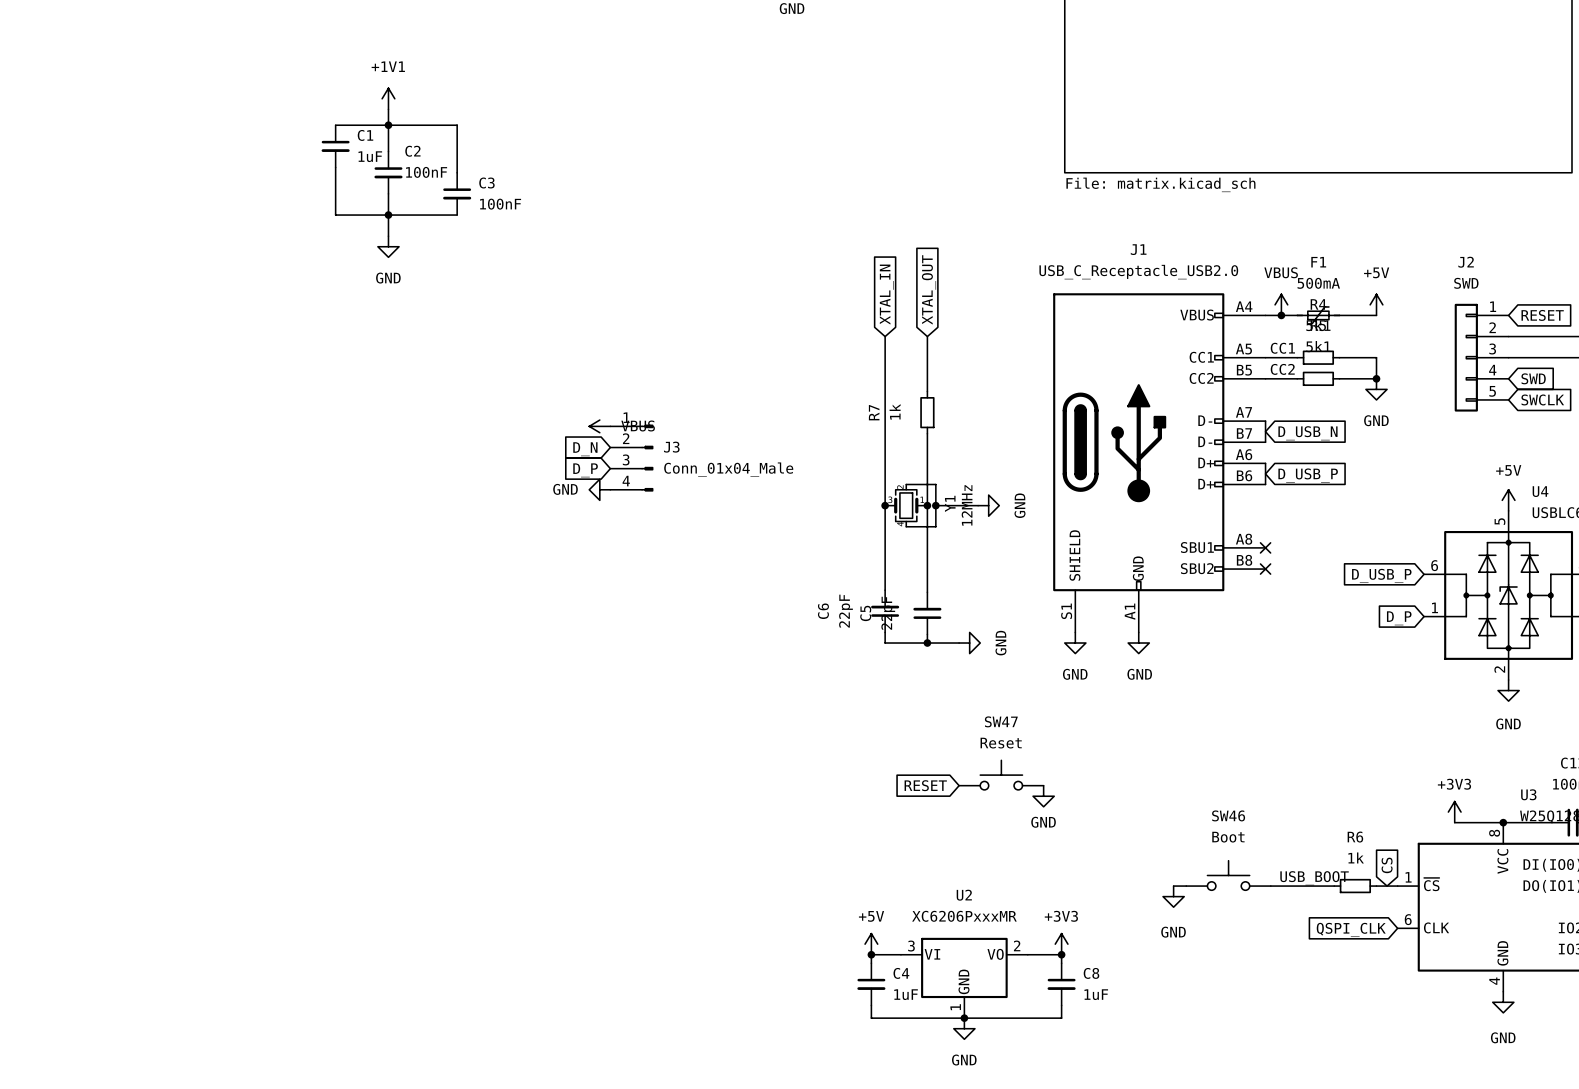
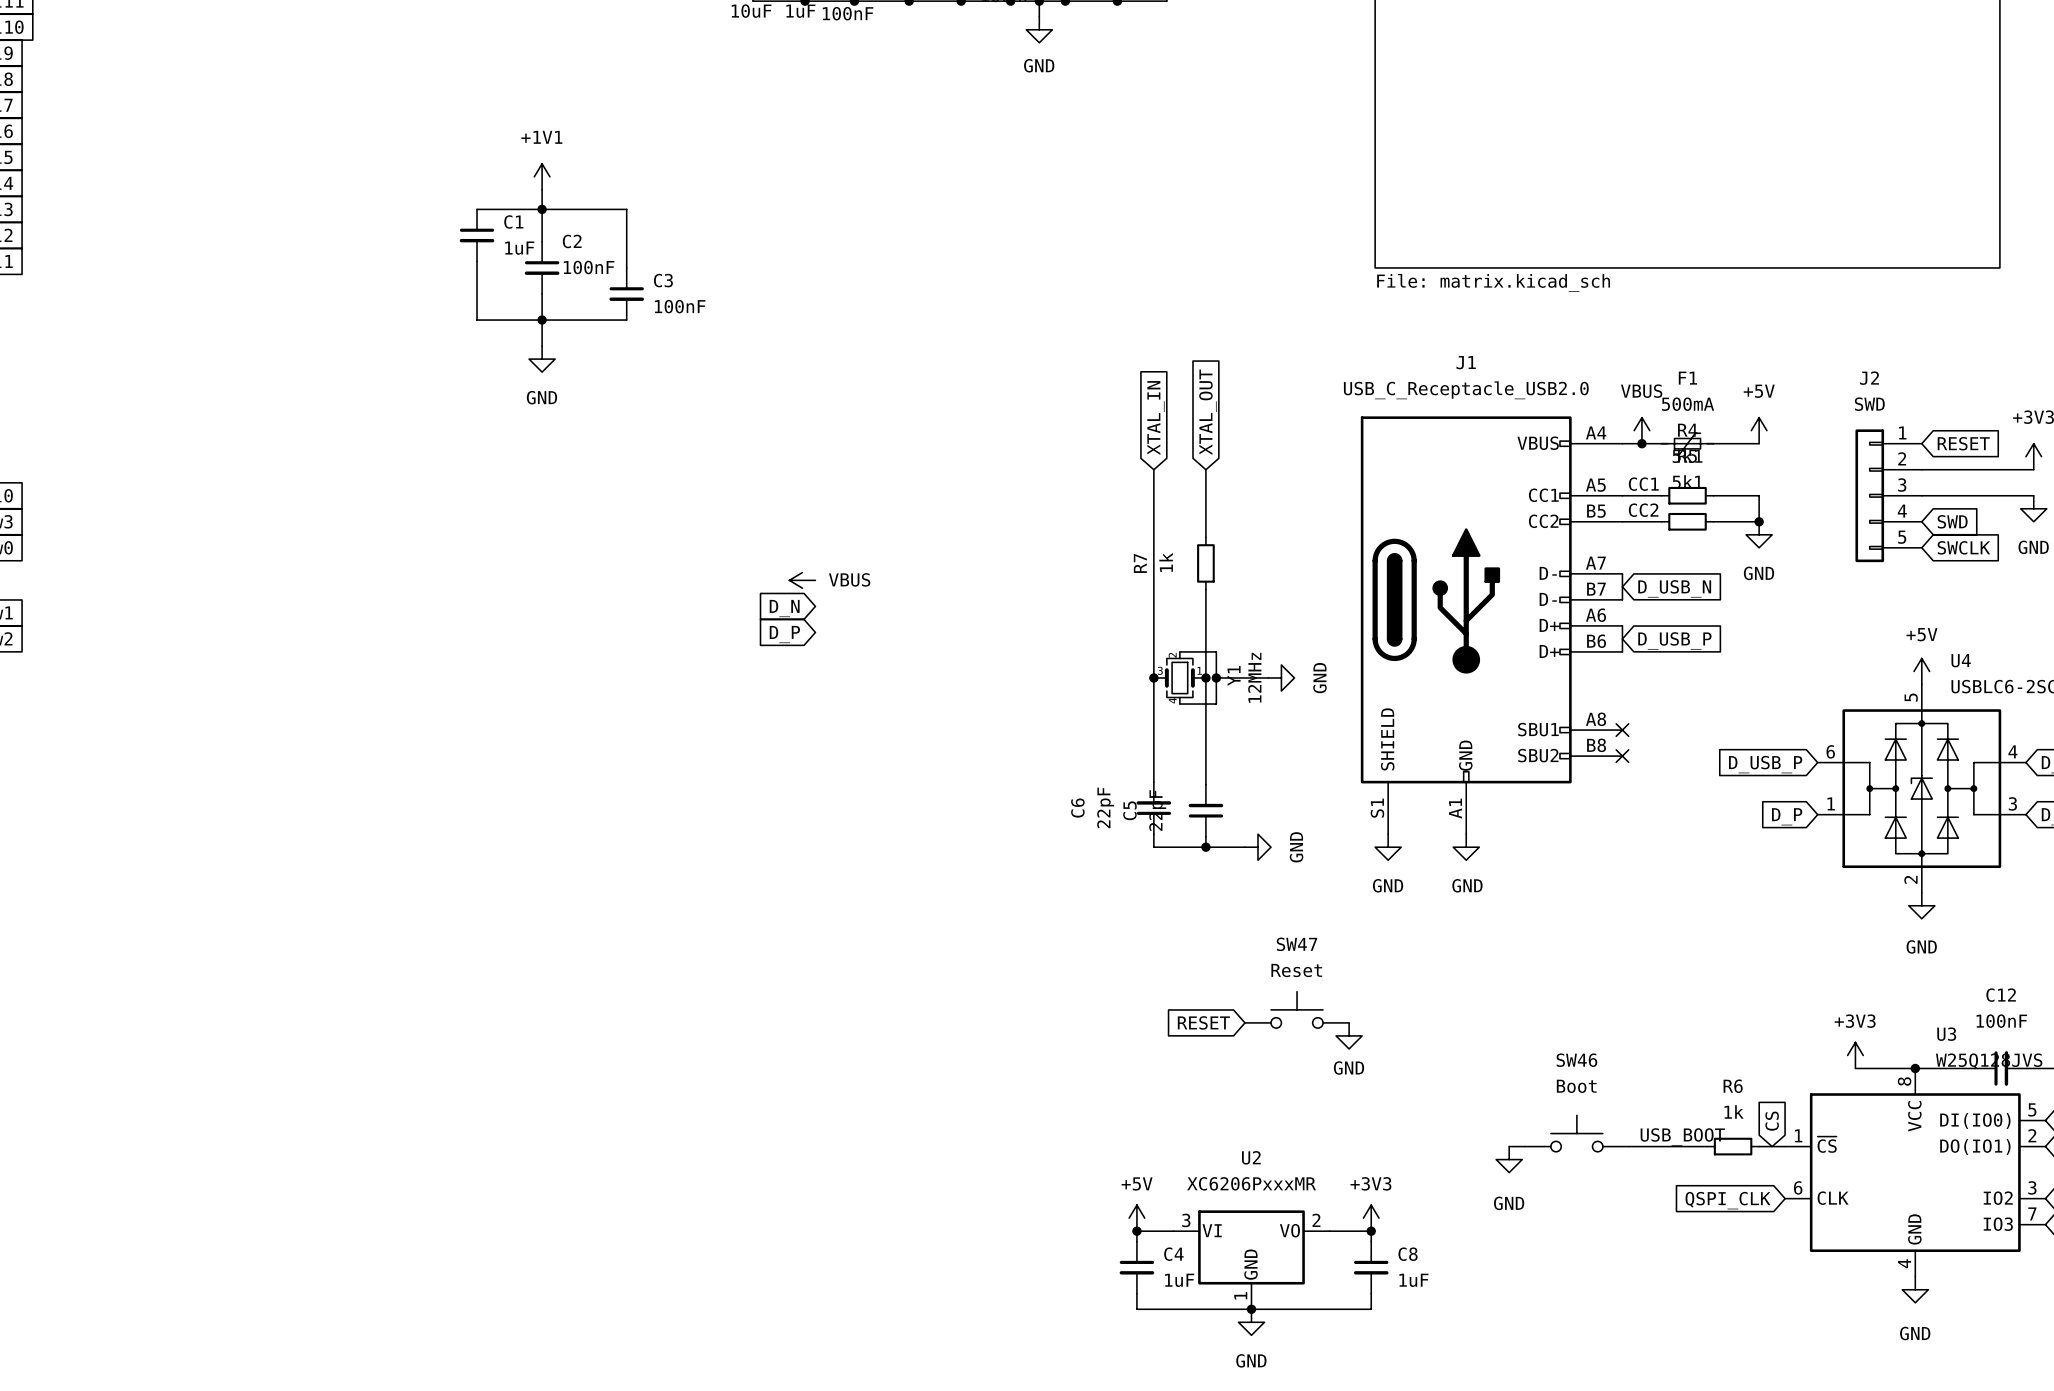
J3: Conn_01x04_Male (631, 458) -> none
power symbol: GND (599, 489) -> none

